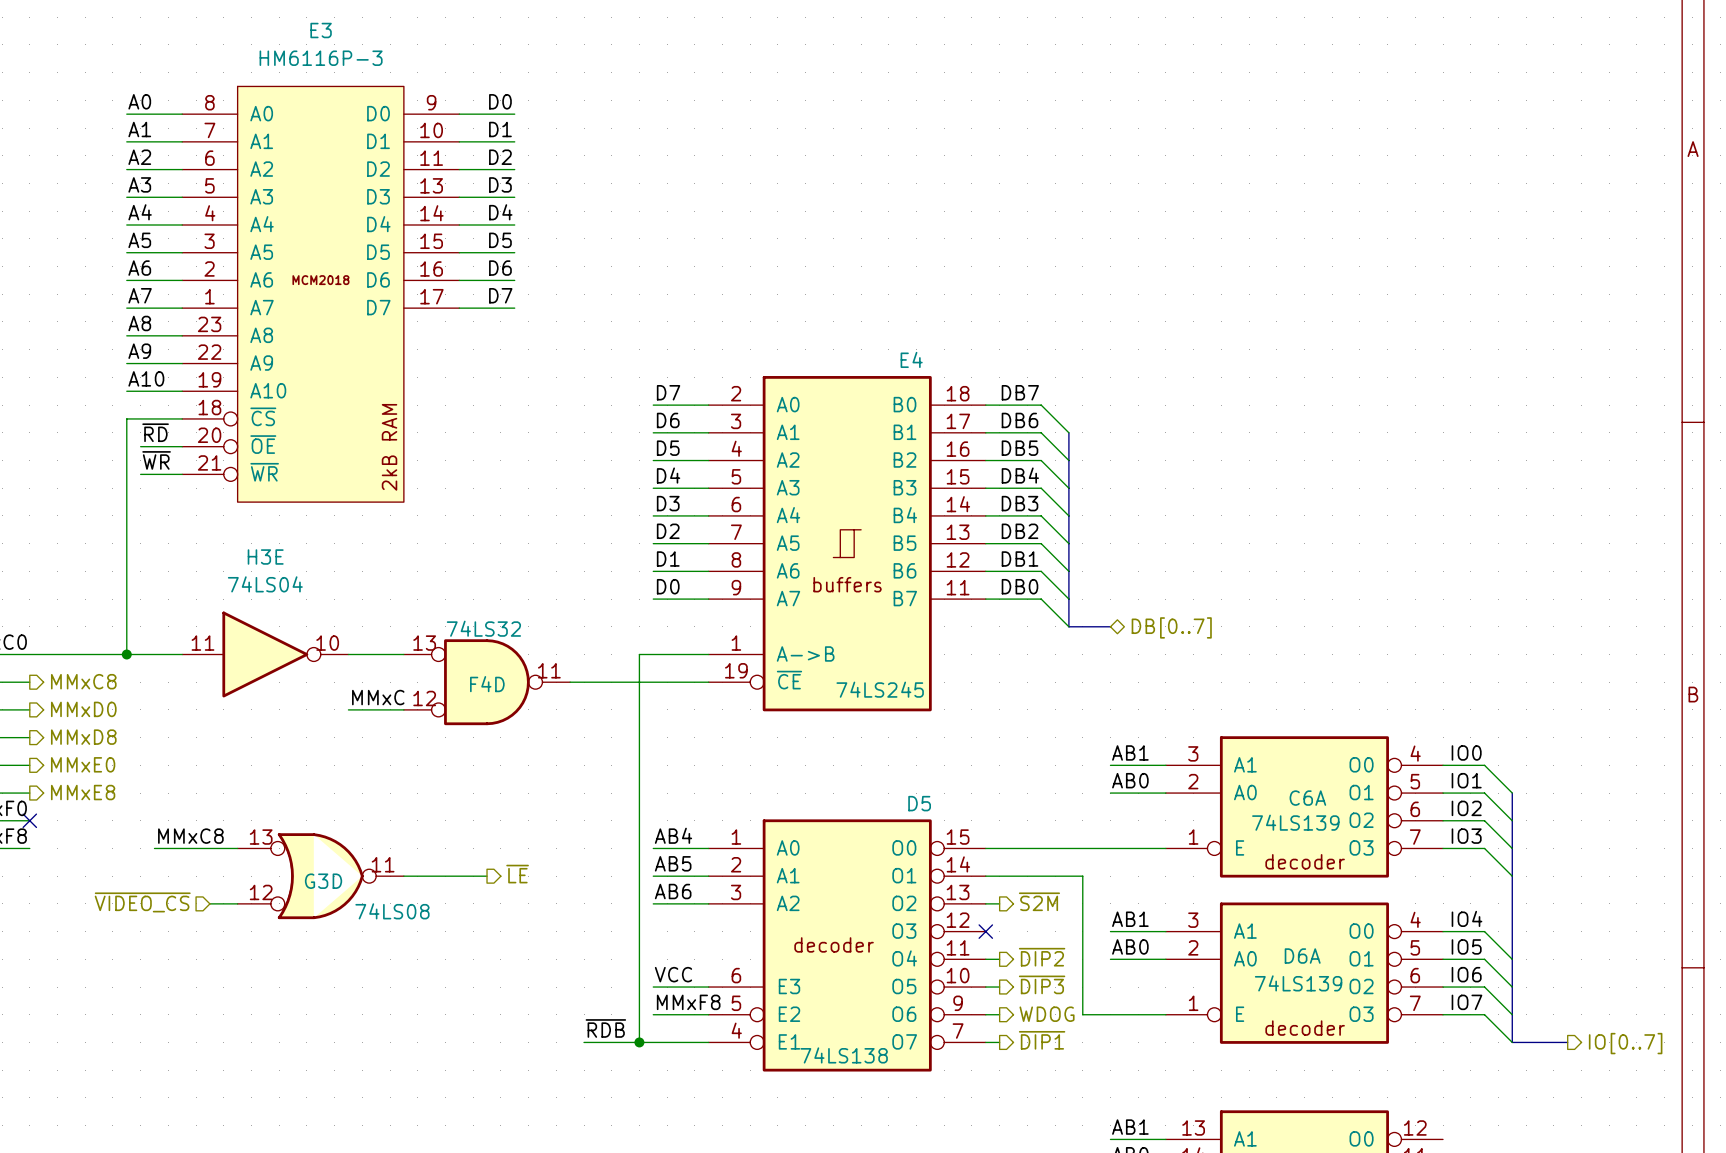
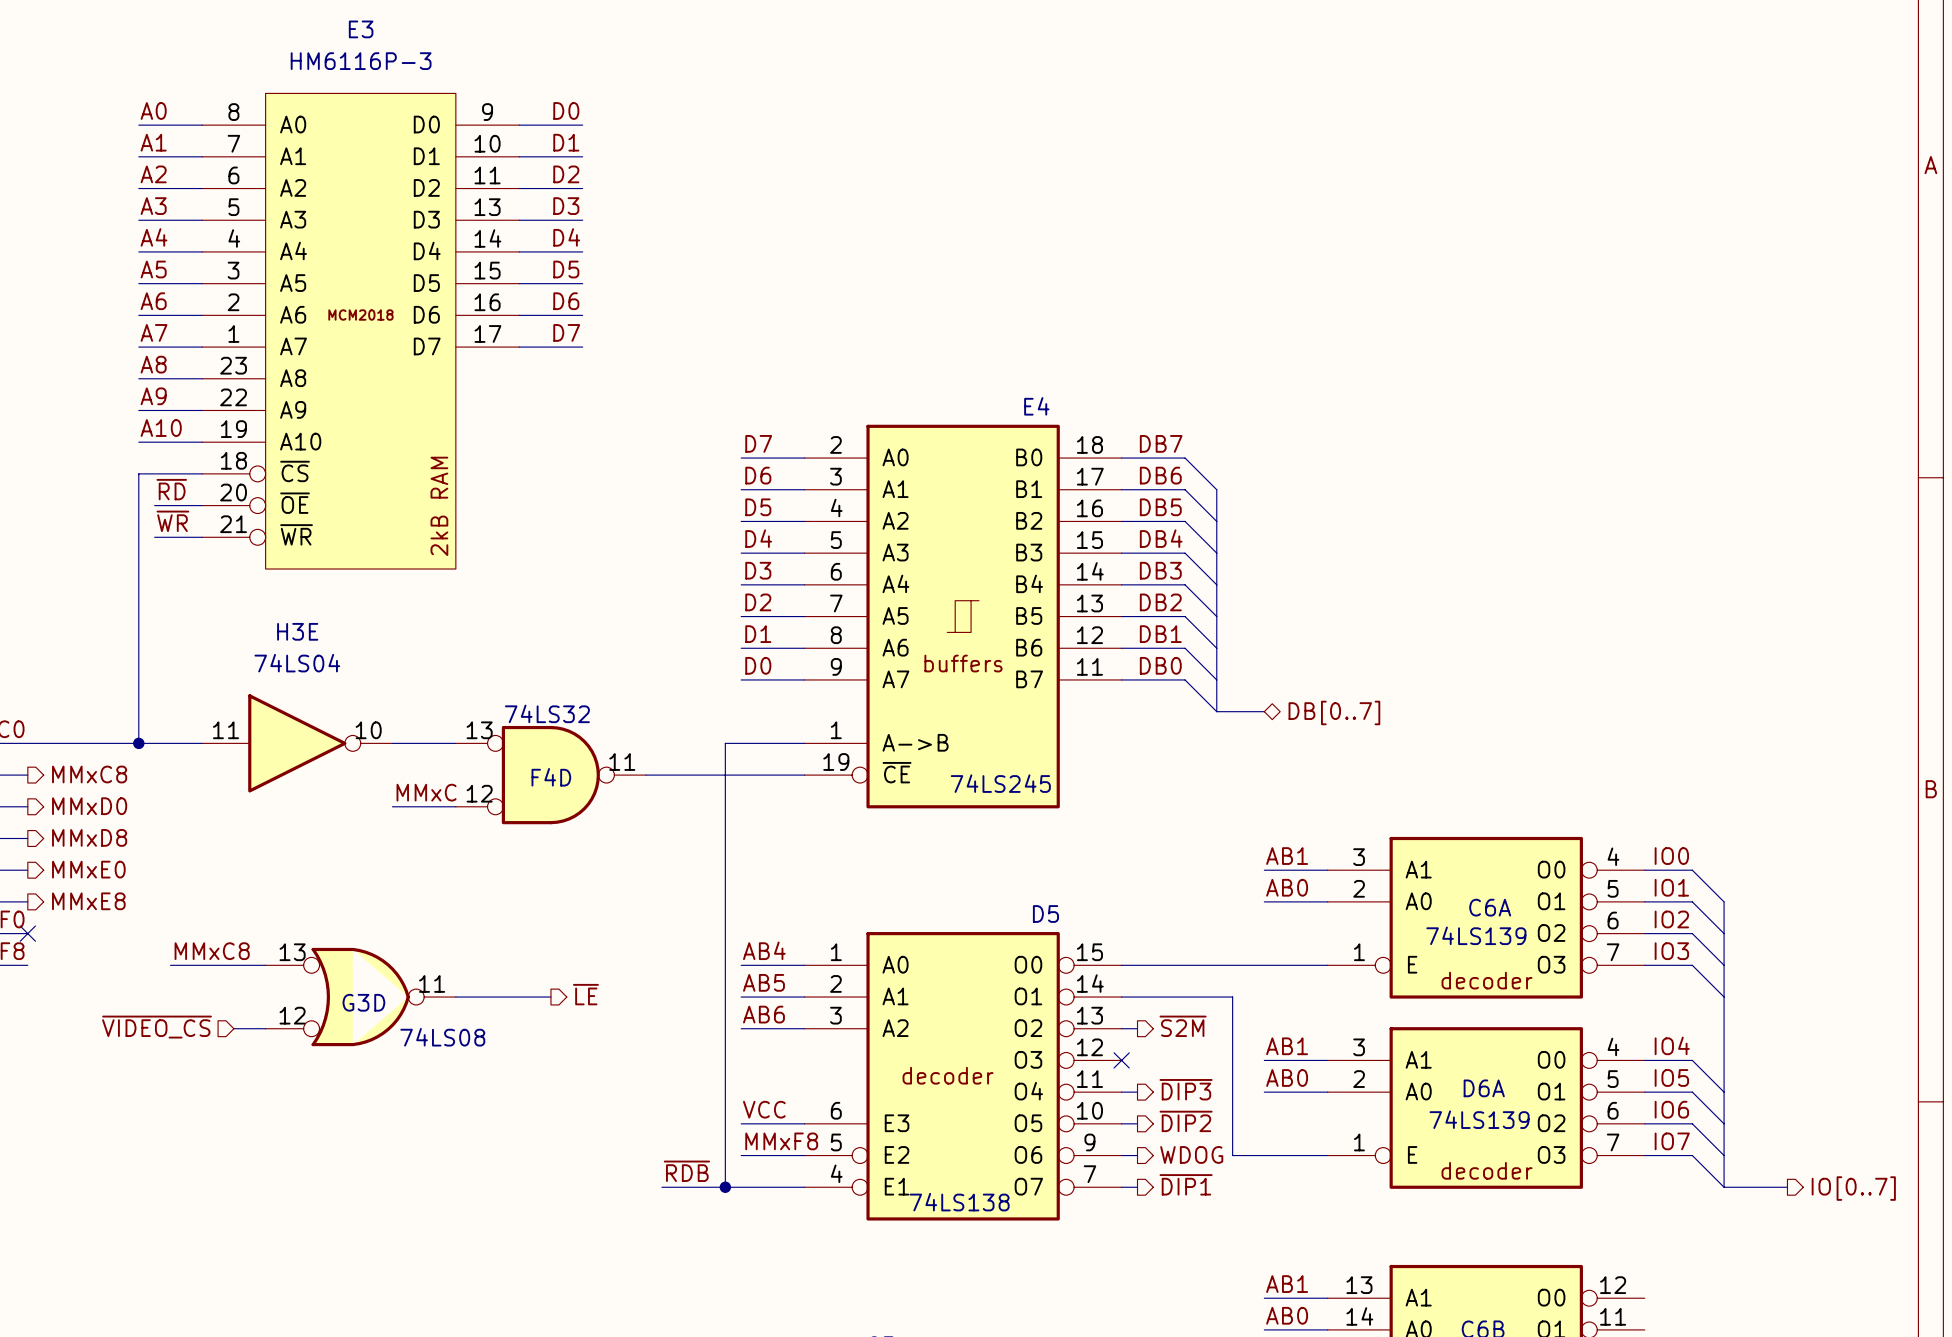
hierarchical label: ~{DIP2} (1042, 957) -> ~{DIP3} (1186, 1089)
hierarchical label: ~{DIP3} (1042, 984) -> ~{DIP2} (1186, 1121)

